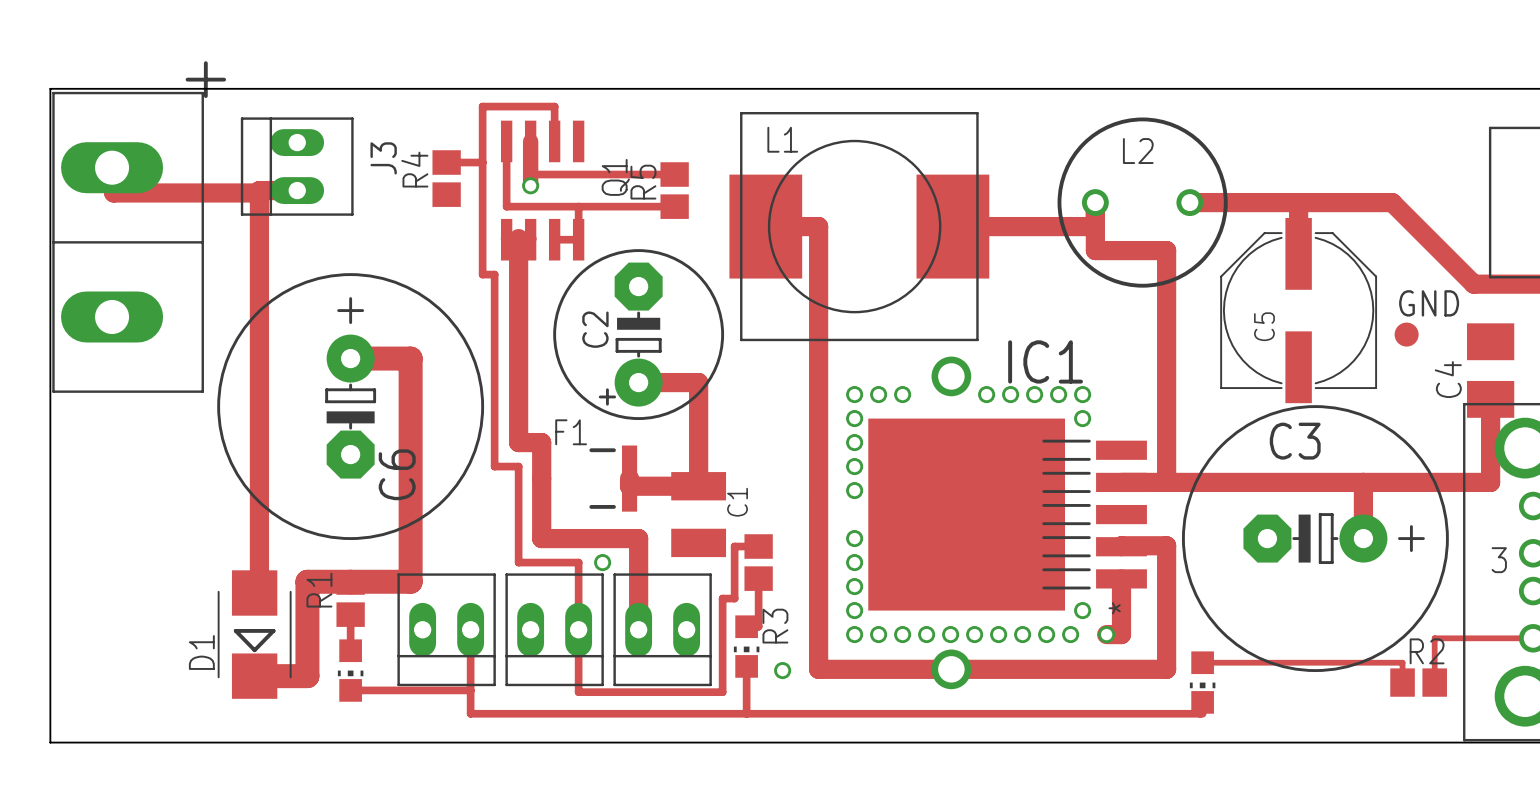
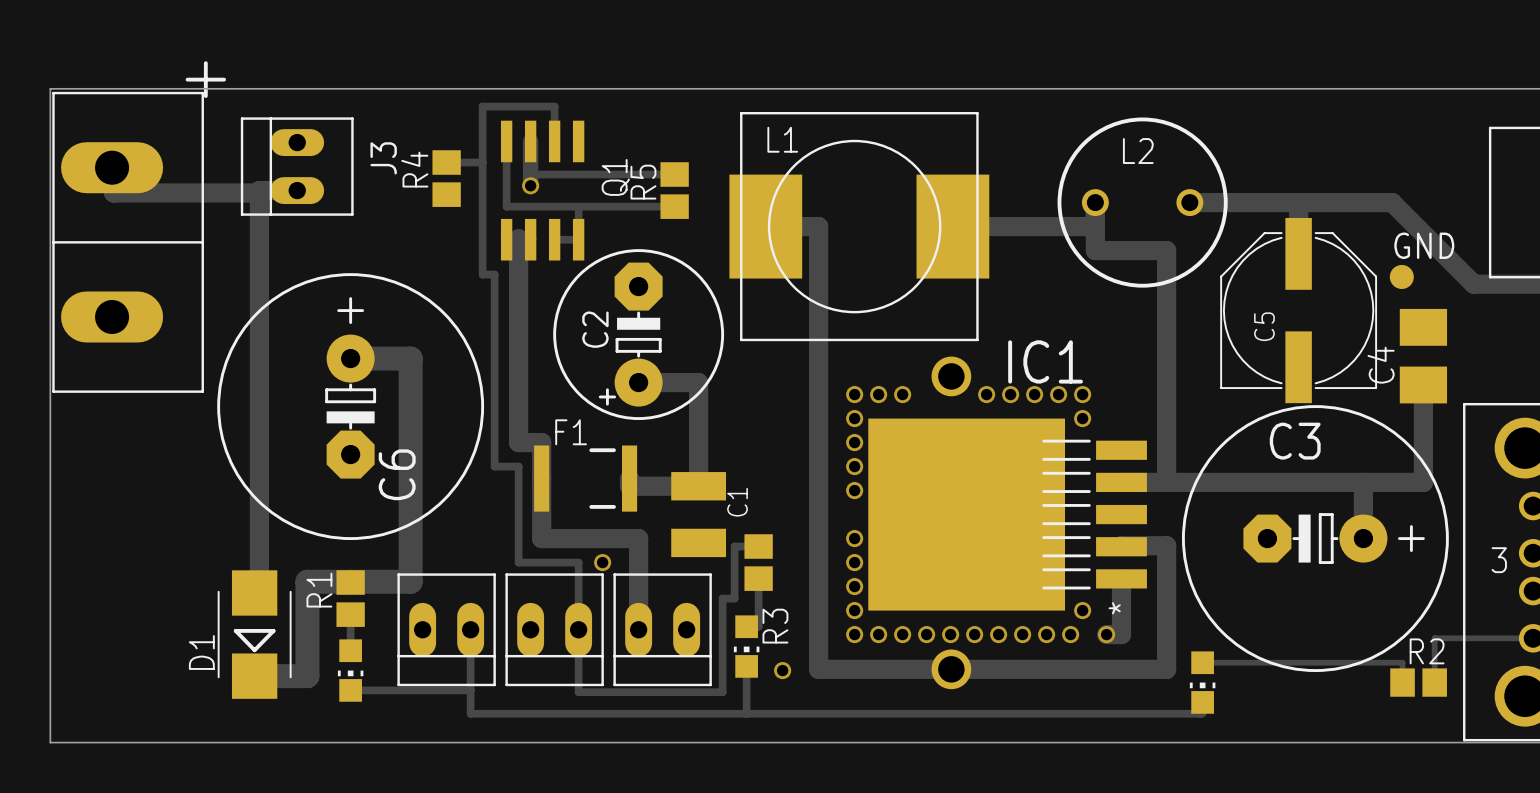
GND position: (1406, 334) -> (1401, 276)
C4 position: (1490, 370) -> (1423, 356)
track: (1490, 399) (1490, 482) (1423, 482) -> (1423, 384) (1423, 482)

